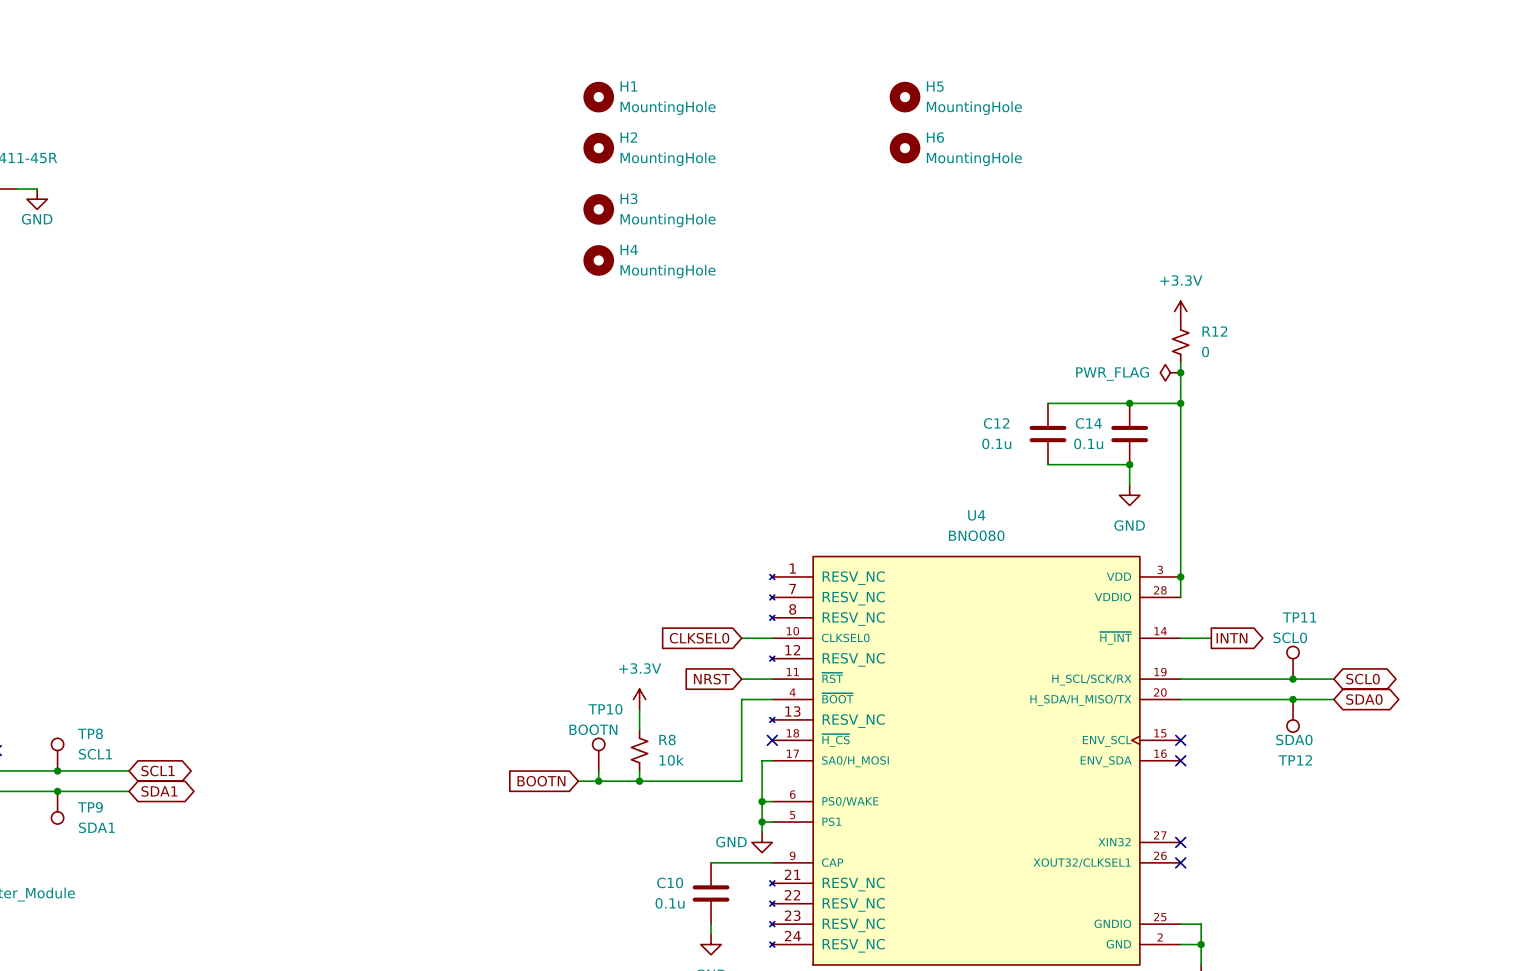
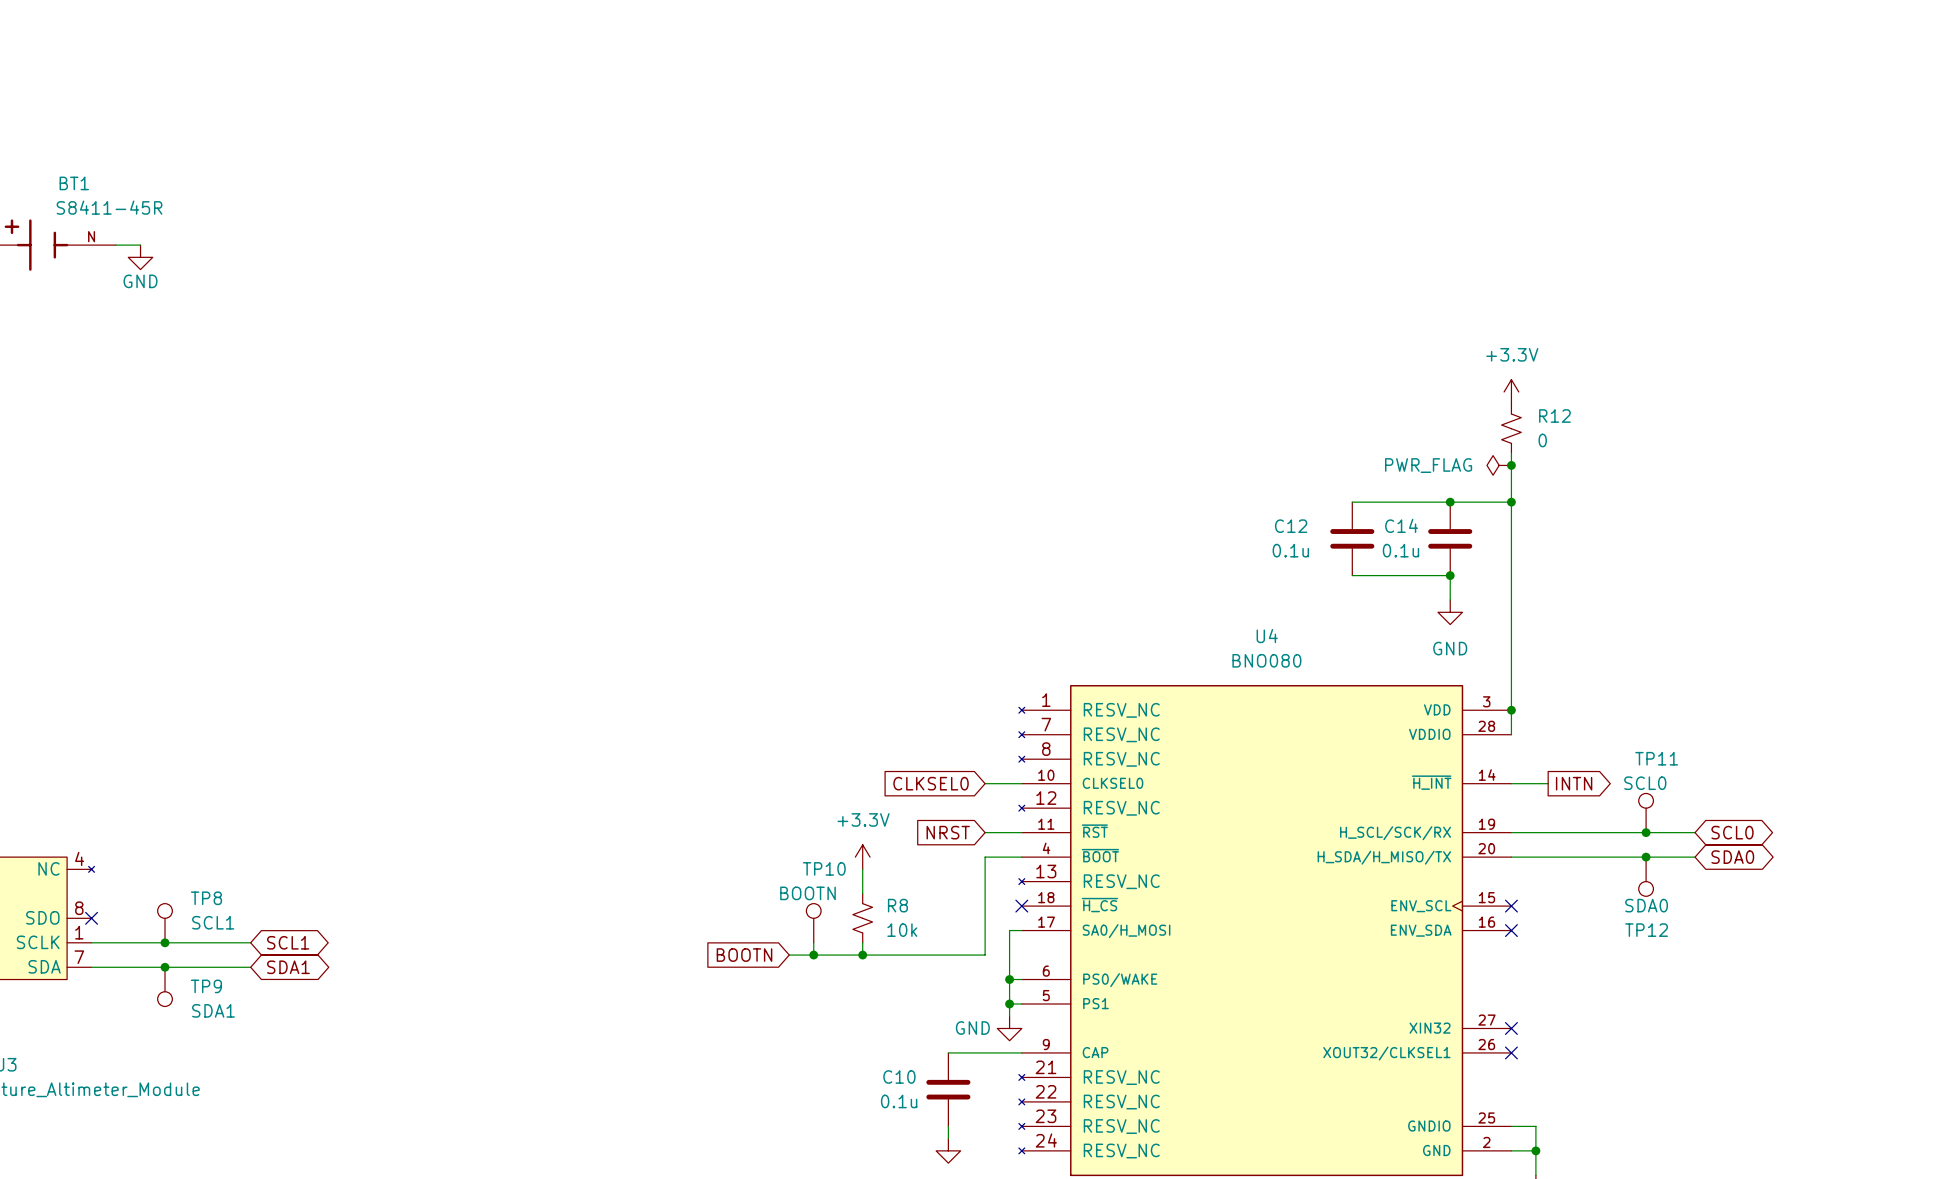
H1: MountingHole (598, 97) -> none
H5: MountingHole (905, 97) -> none
H2: MountingHole (598, 148) -> none
H6: MountingHole (905, 148) -> none
H3: MountingHole (598, 209) -> none
H4: MountingHole (598, 260) -> none

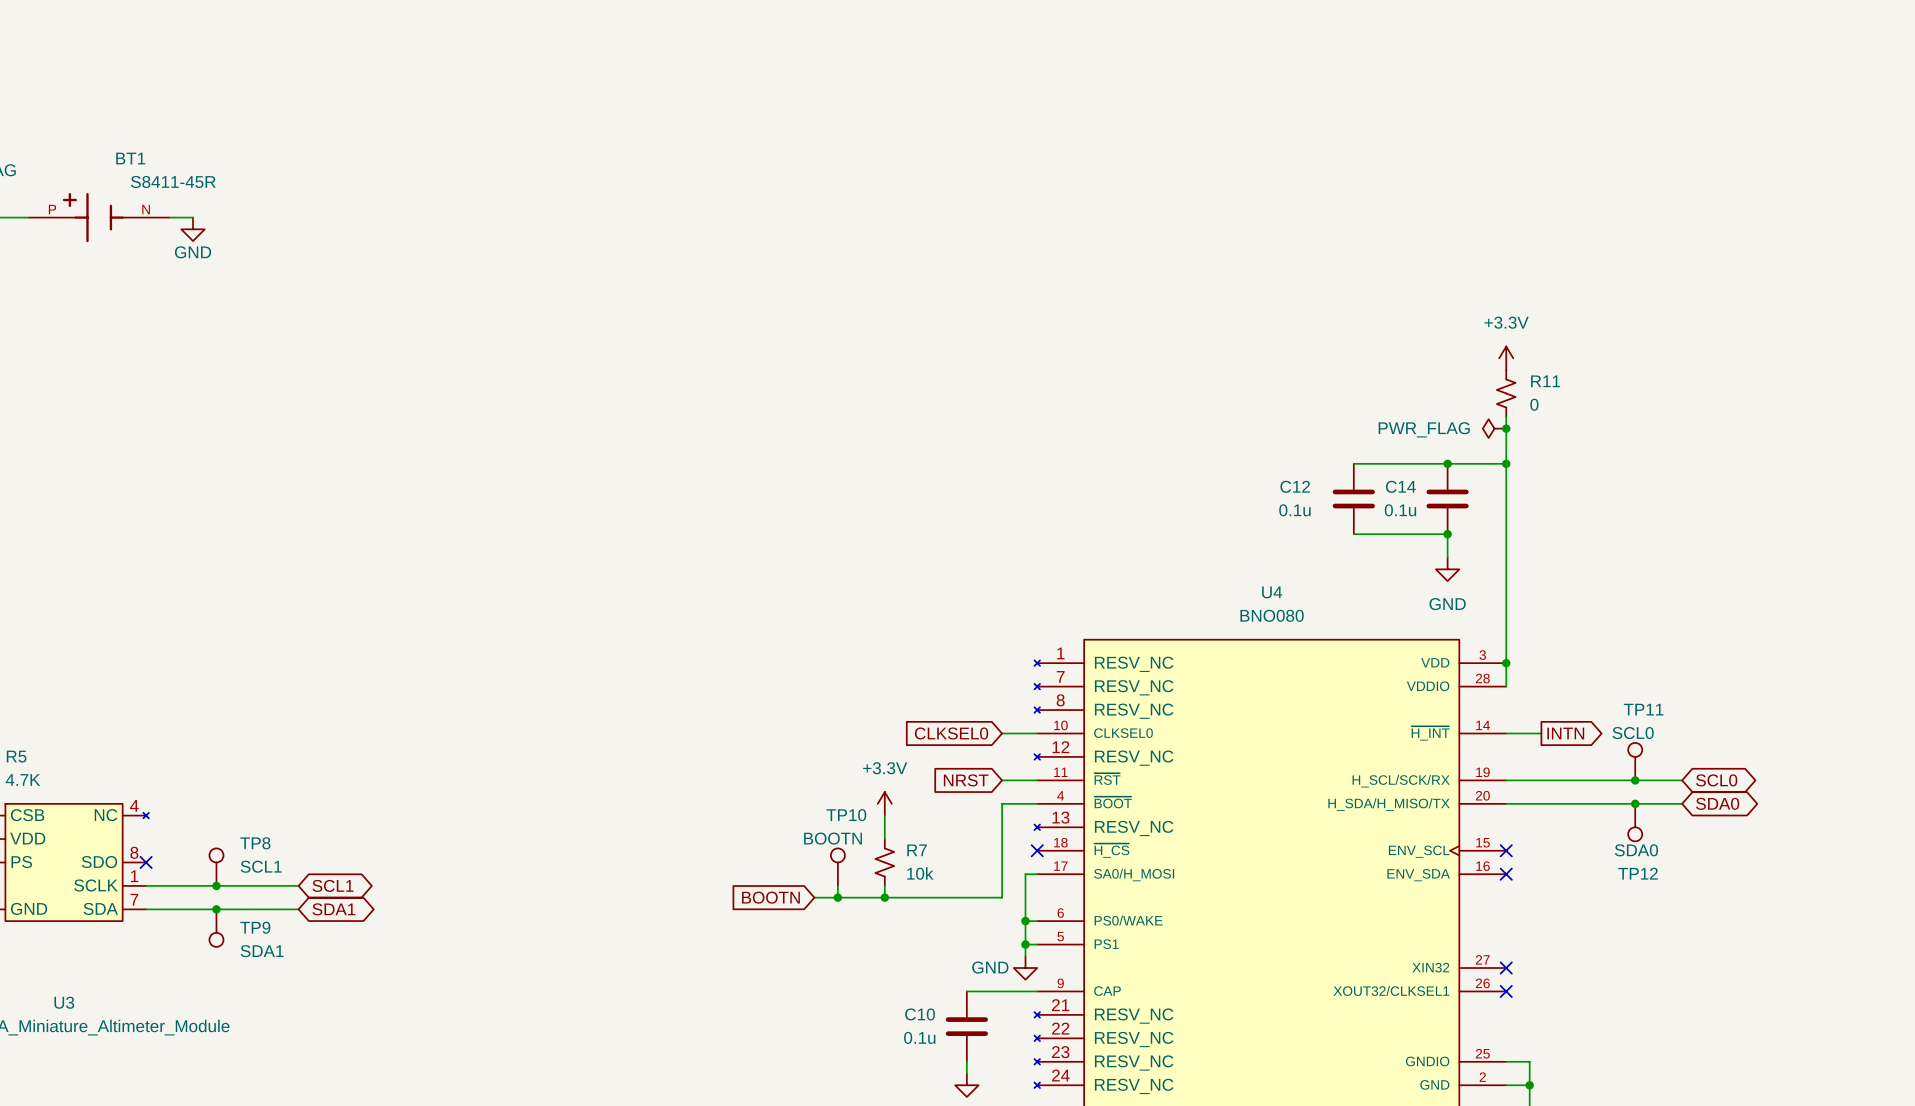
R12 name: R12 (1554, 416) -> R11 (1545, 381)
R8 name: R8 (897, 905) -> R7 (917, 850)

